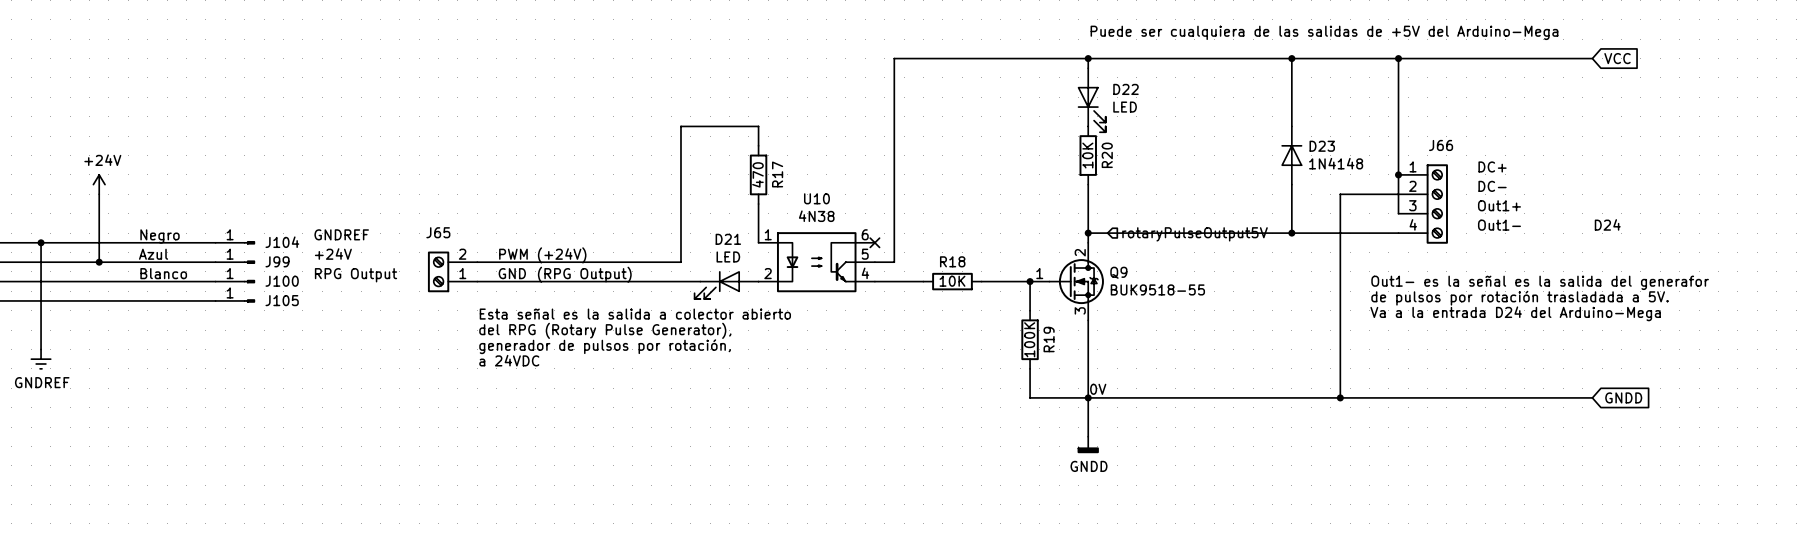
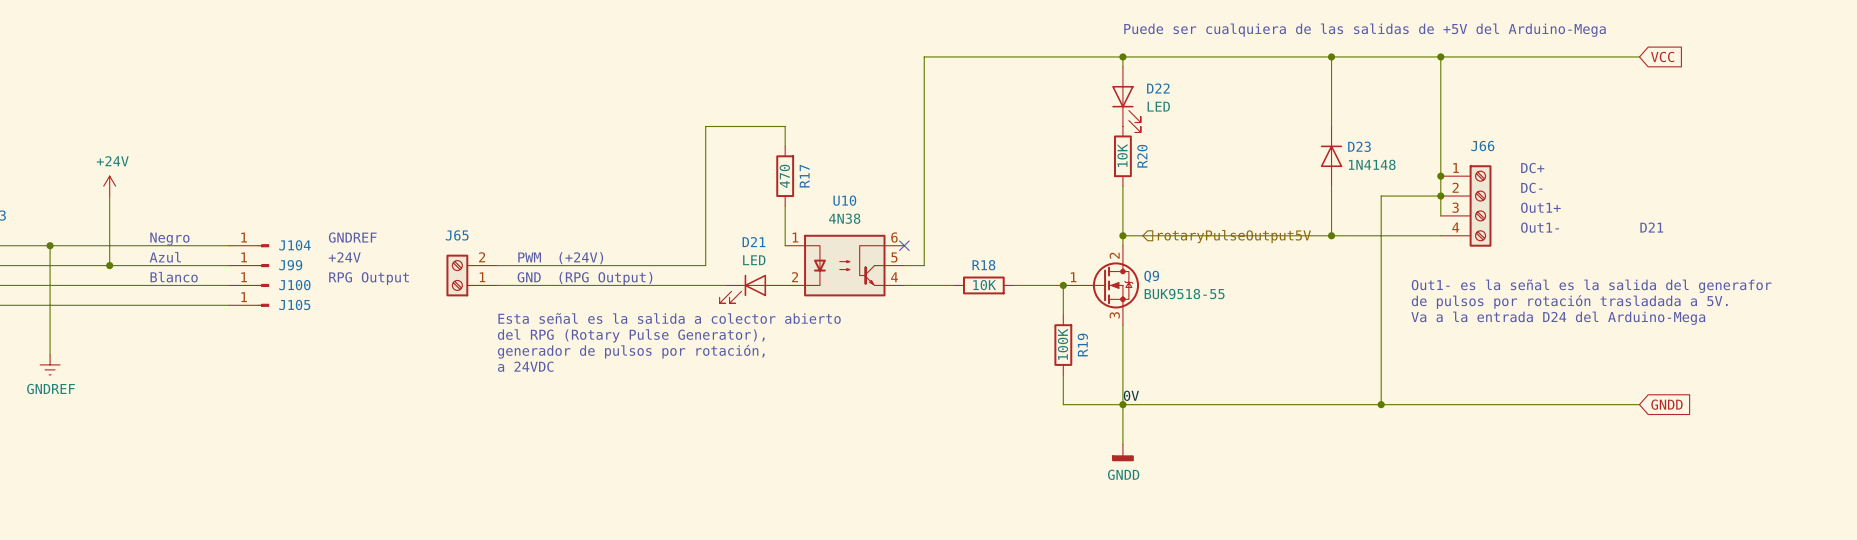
junction: none -> (1440, 196)
text: D24 (1607, 224) -> D21 (1651, 227)

